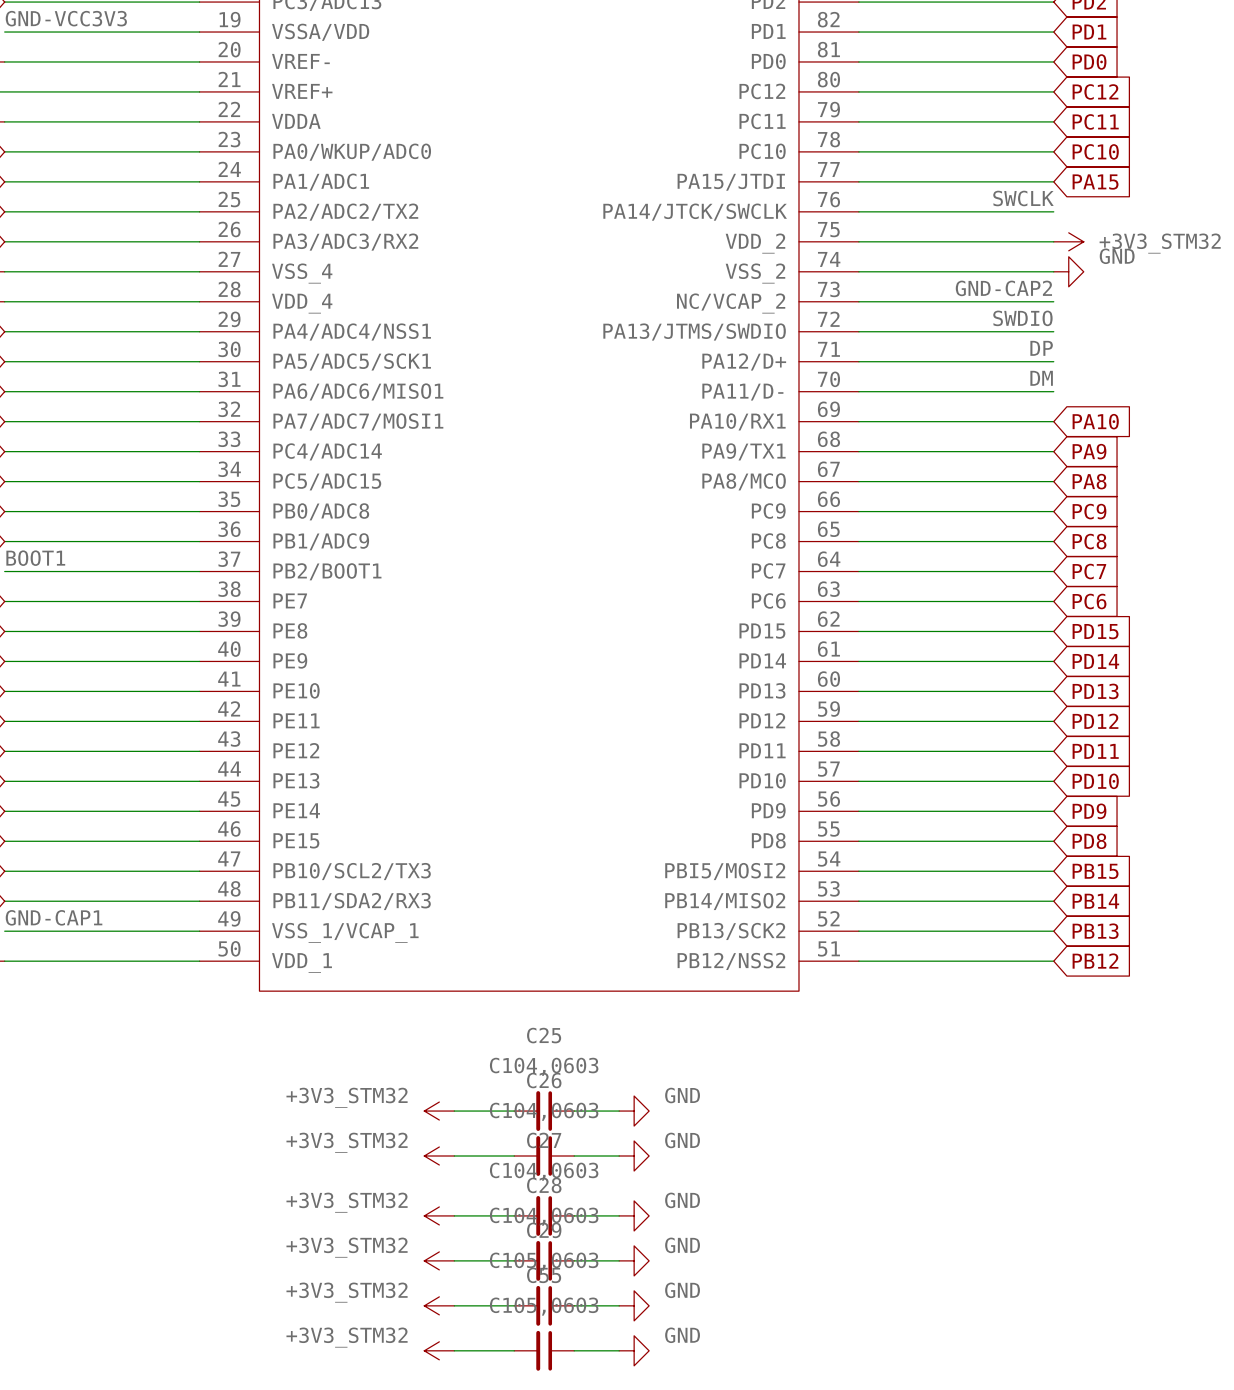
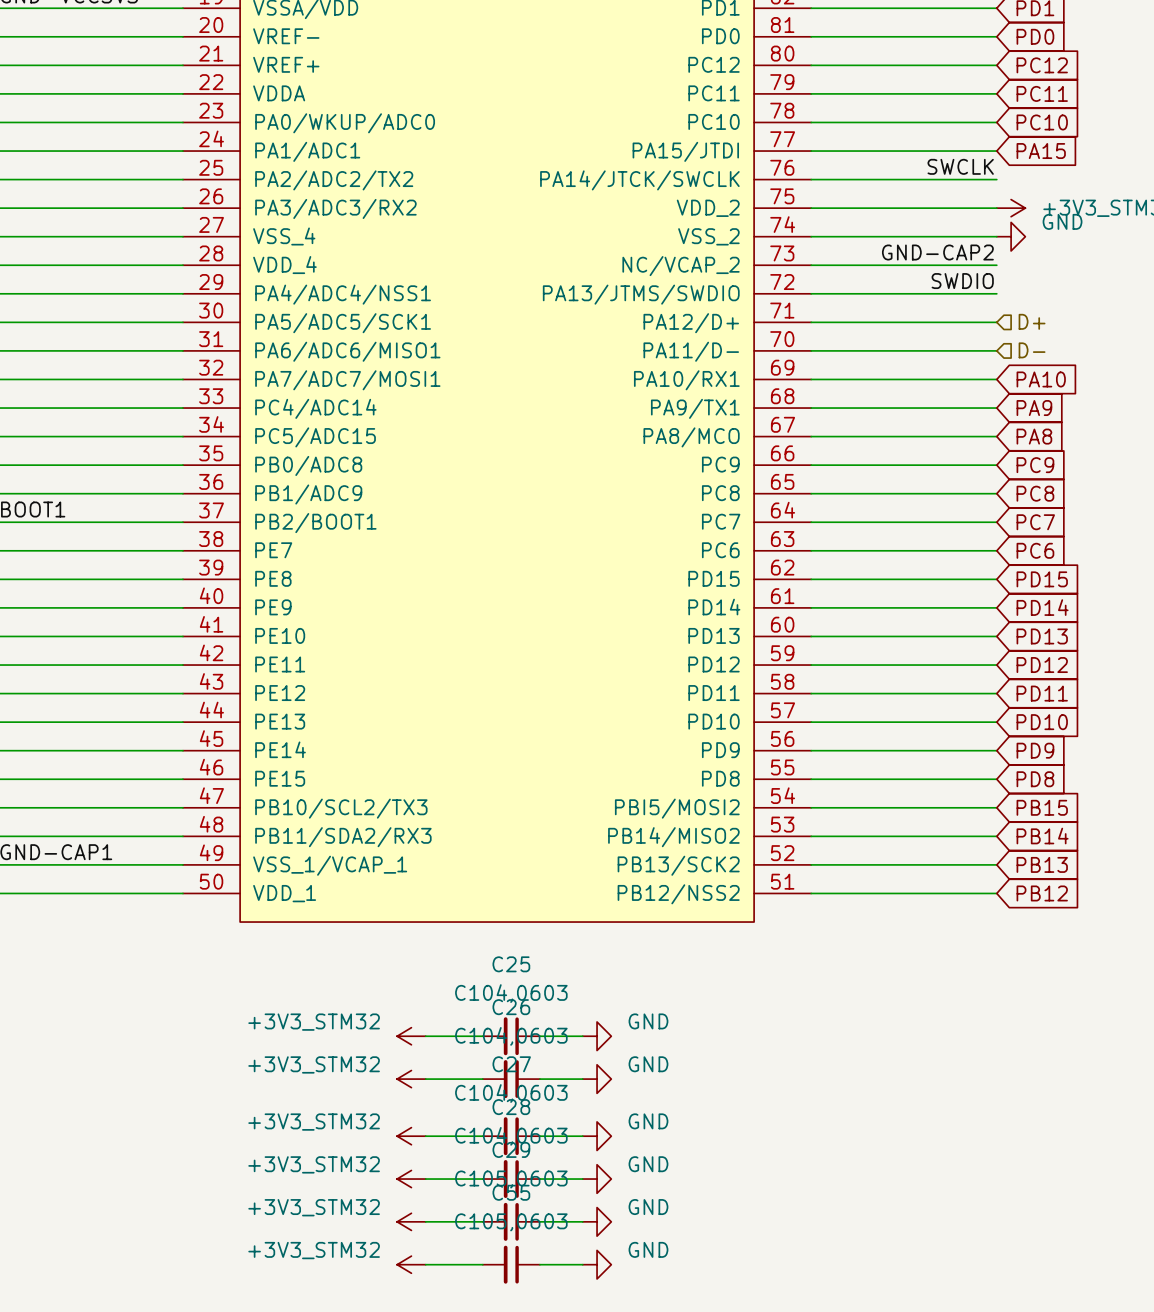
label: DP (1041, 348) -> none
hierarchical label: none -> D+ (1032, 321)
label: DM (1041, 378) -> none
hierarchical label: none -> D- (1032, 350)

